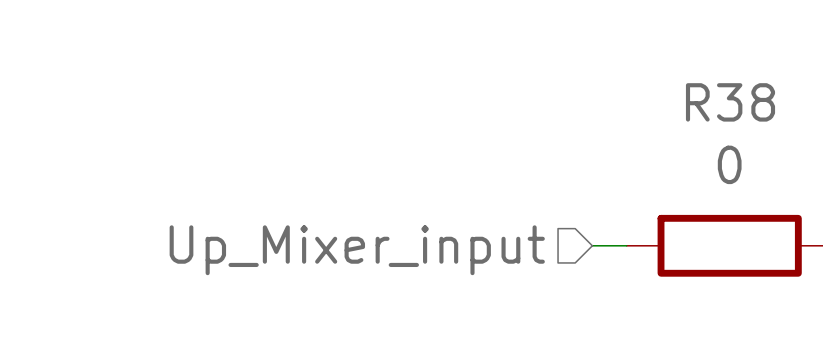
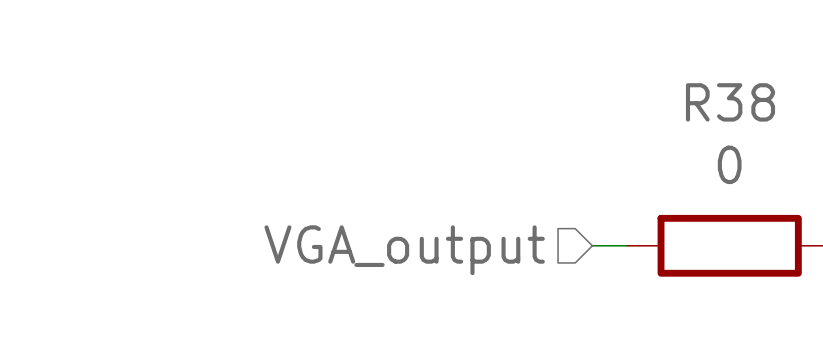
hierarchical label: Up_Mixer_input (357, 250) -> VGA_output (404, 250)

